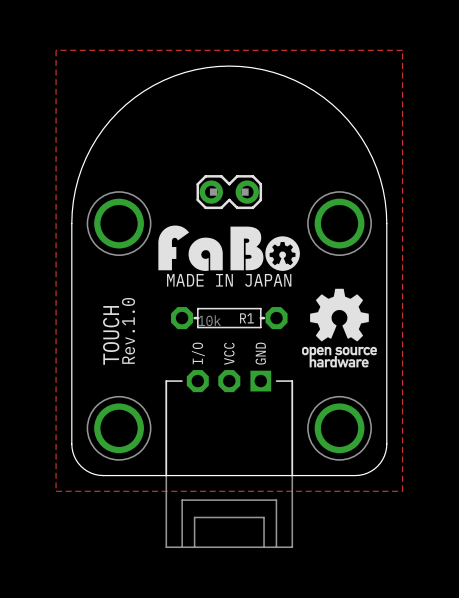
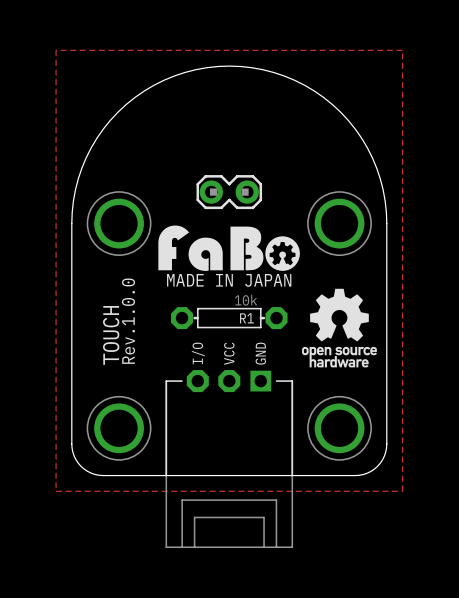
R1 value position: 10k (209, 320) -> 10k (246, 300)
text: Rev.1.0 (128, 330) -> Rev.1.0.0 (128, 321)

